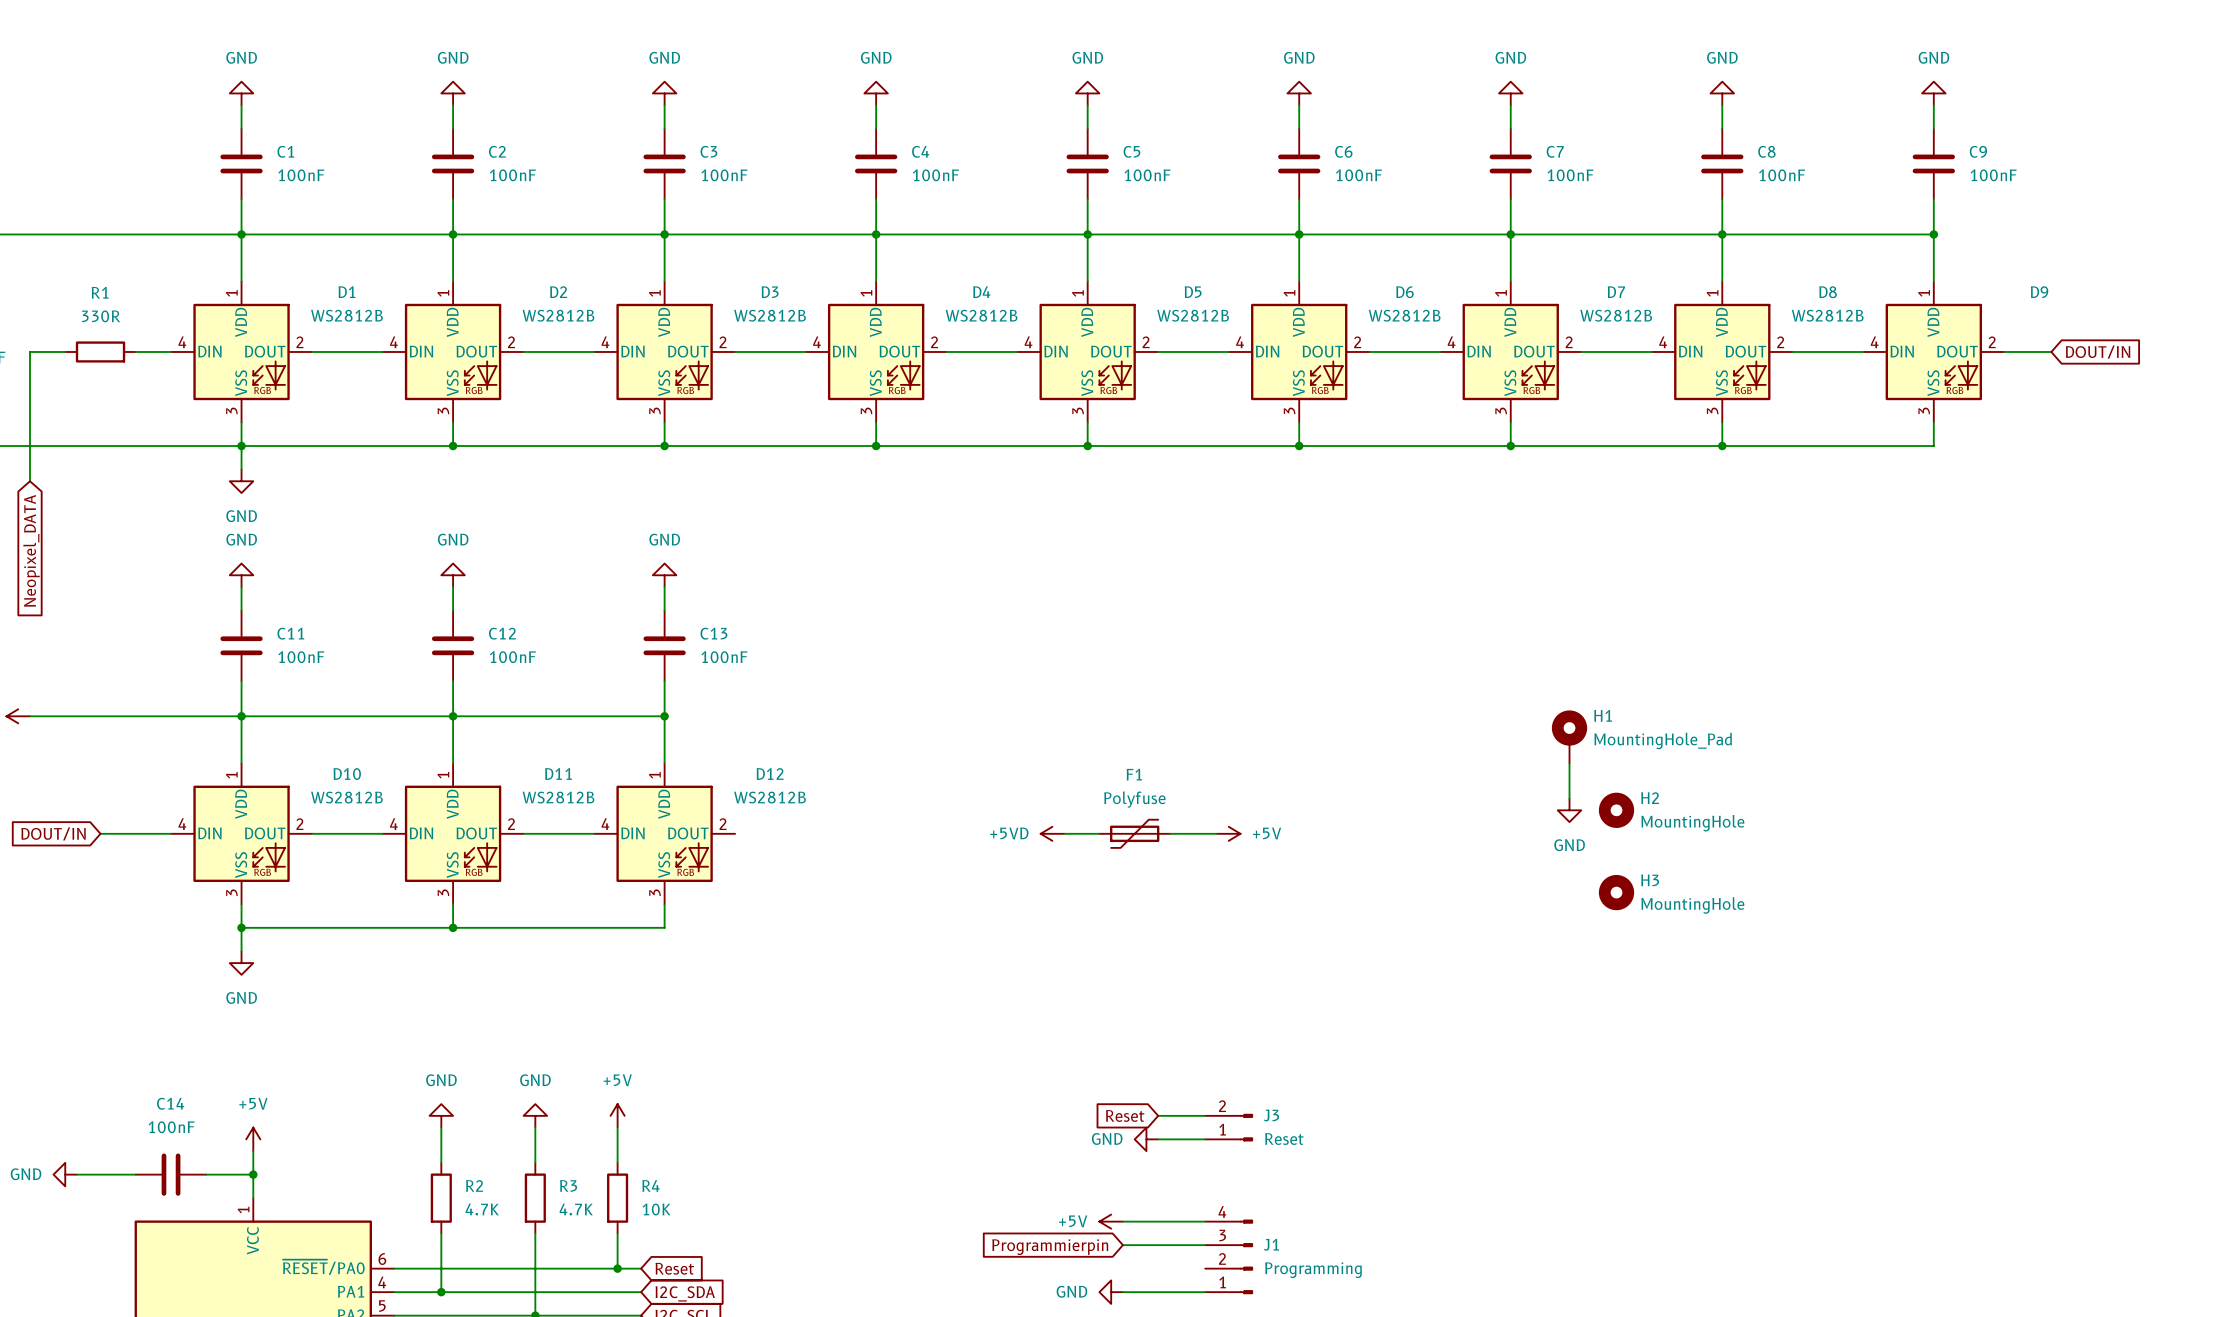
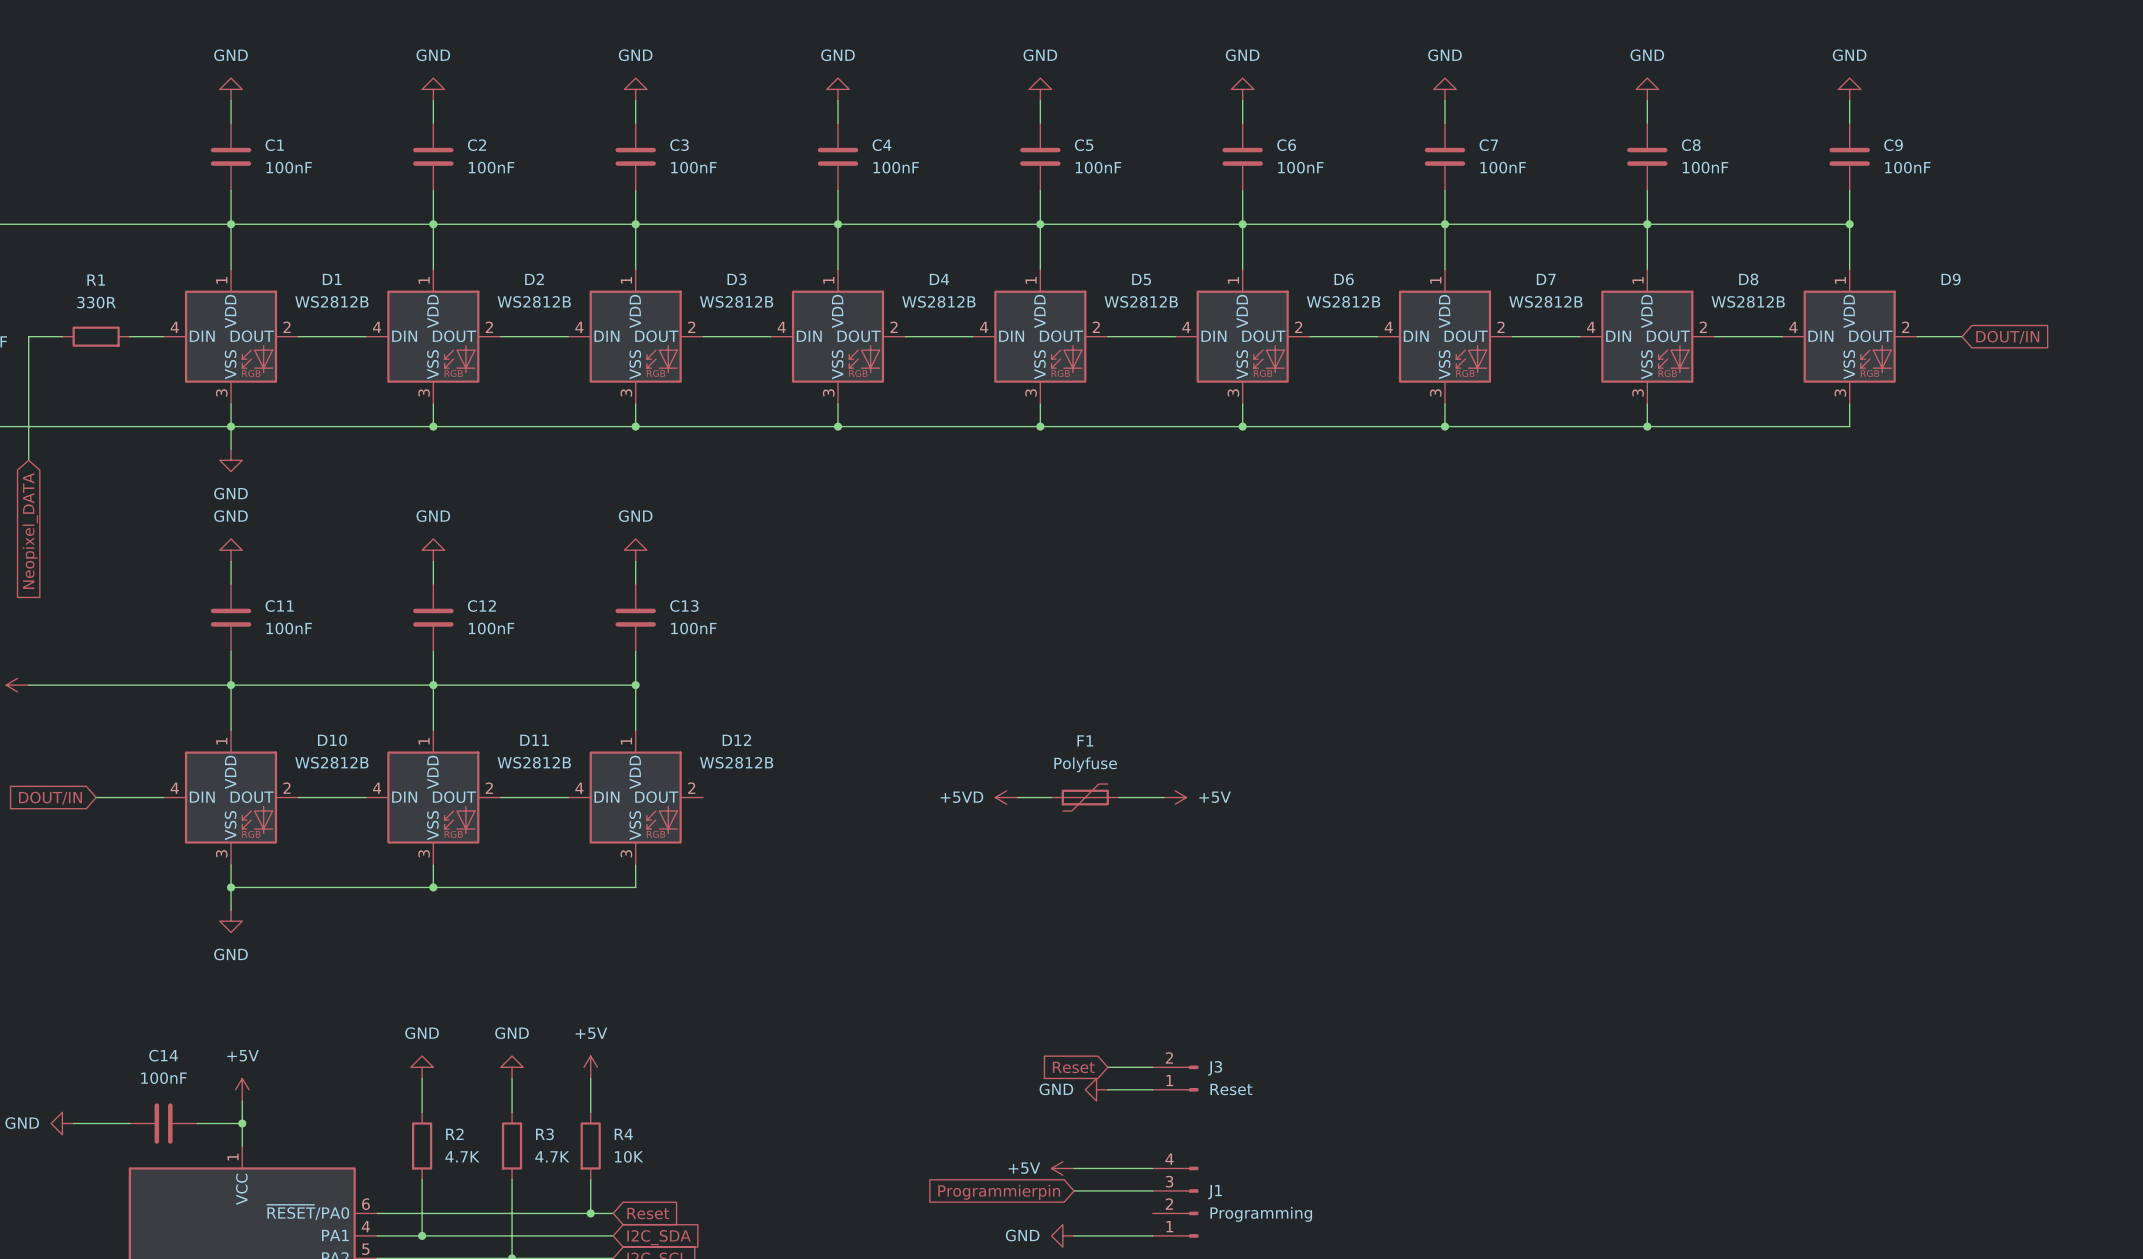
H1: MountingHole_Pad (1569, 736) -> none
wire: (1569, 763) (1569, 798) -> none
power symbol: GND (1569, 810) -> none
H2: MountingHole (1616, 810) -> none
H3: MountingHole (1616, 892) -> none

